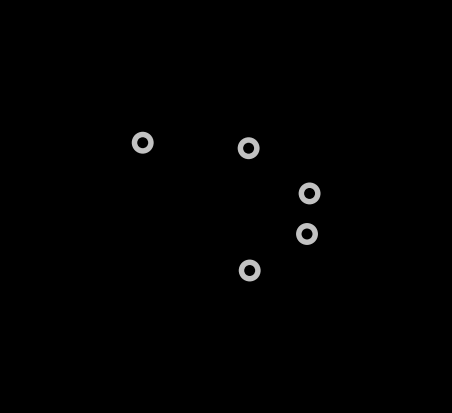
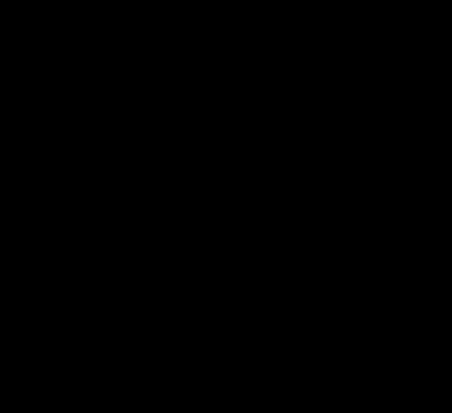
via: (142, 142) -> none
via: (248, 148) -> none
via: (309, 193) -> none
via: (307, 233) -> none
via: (249, 270) -> none

